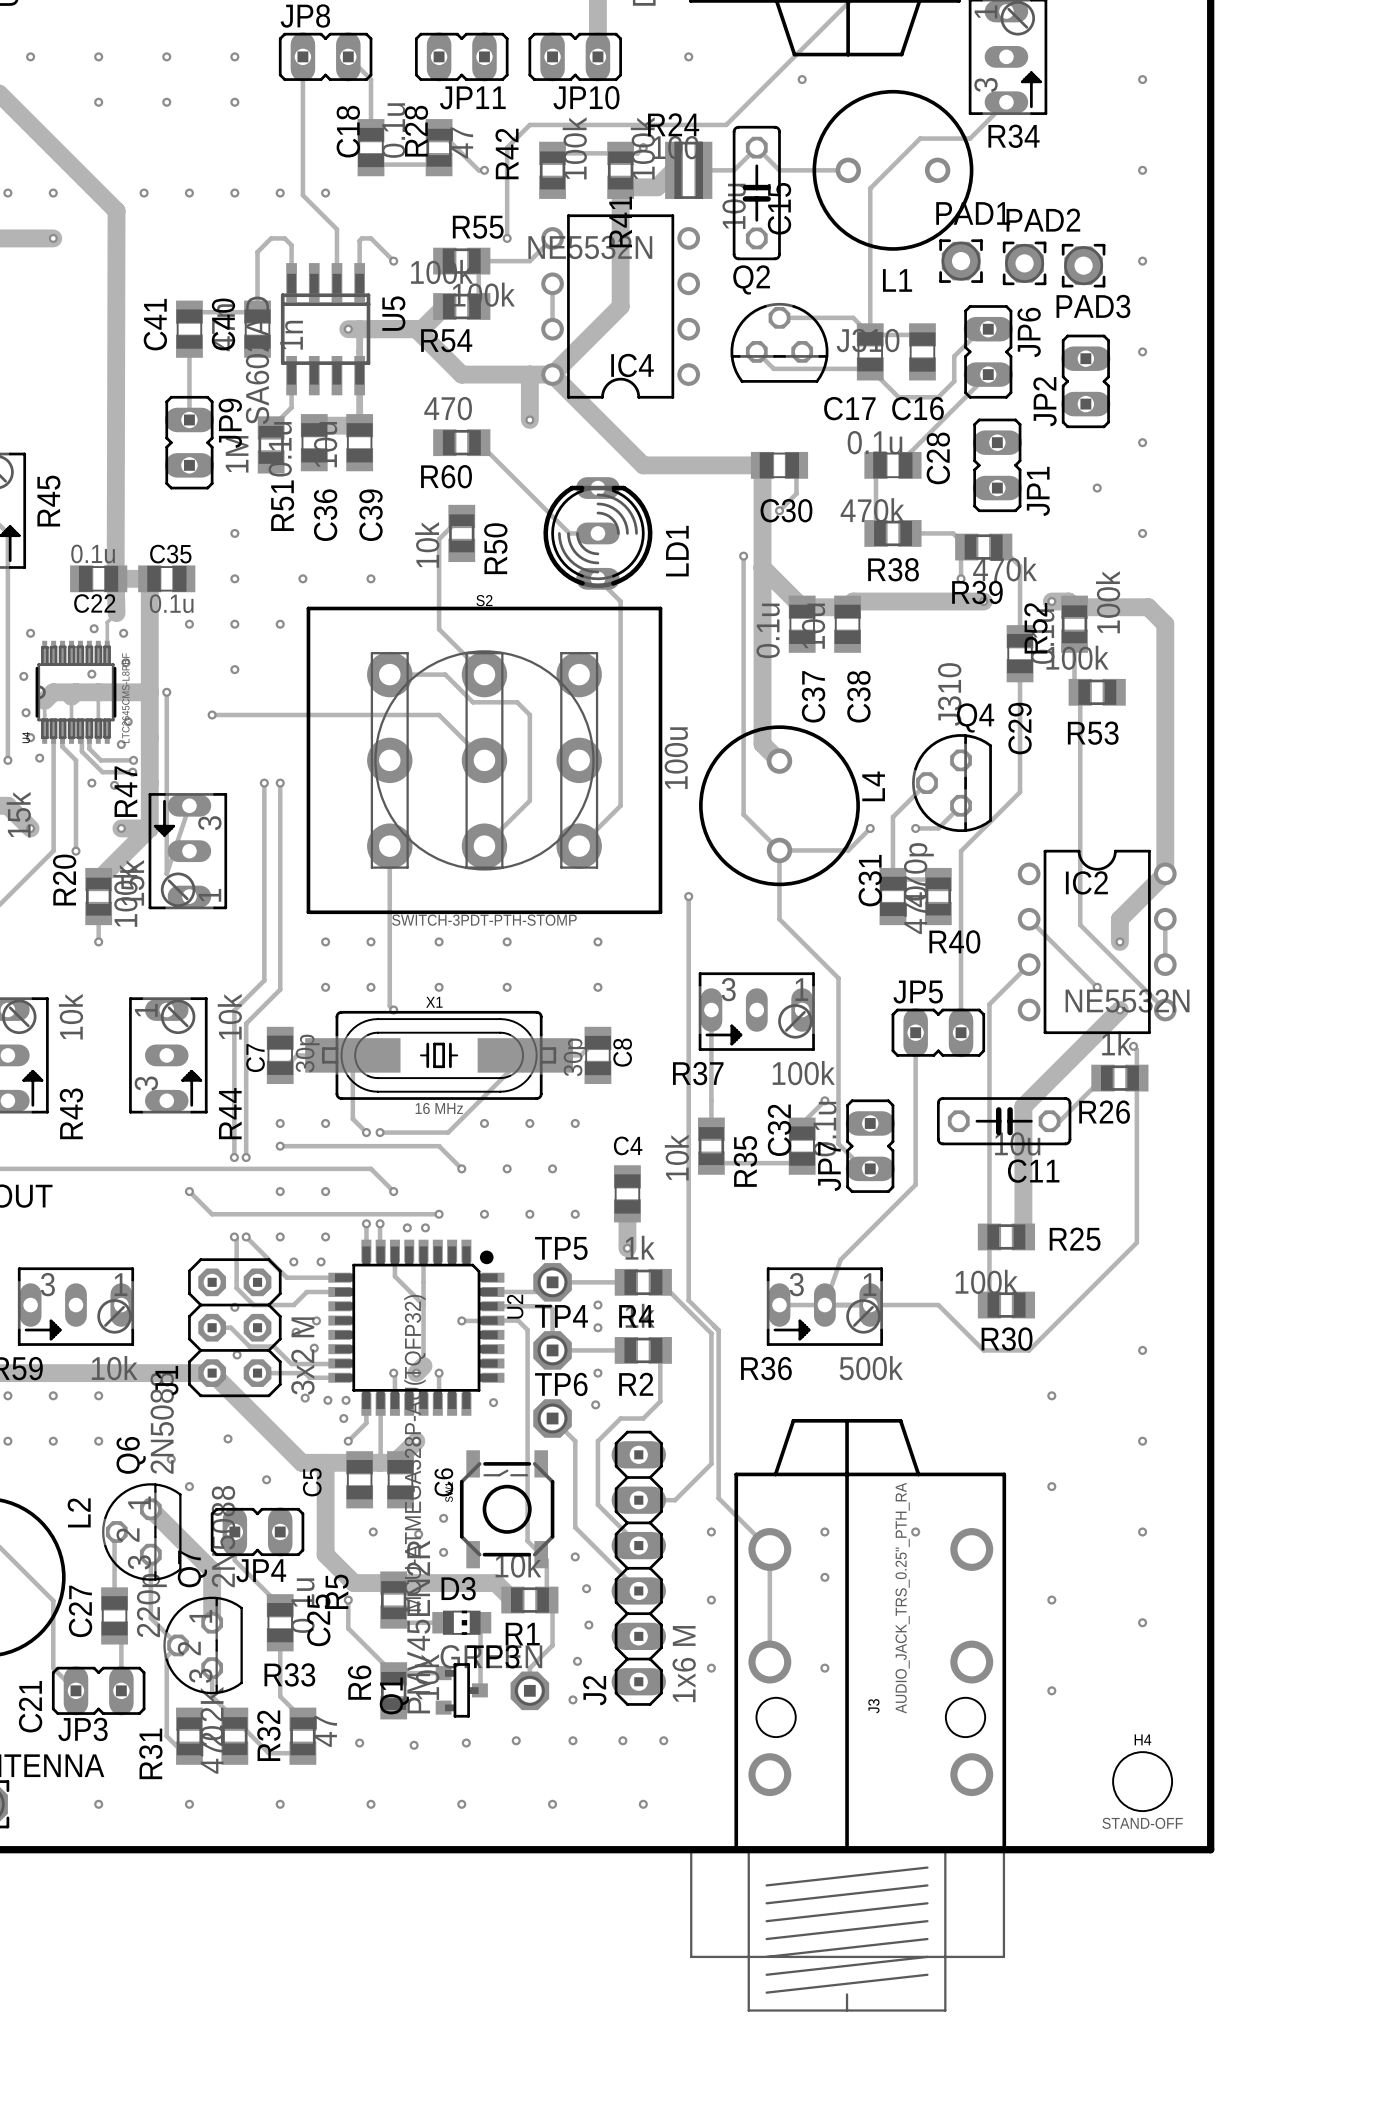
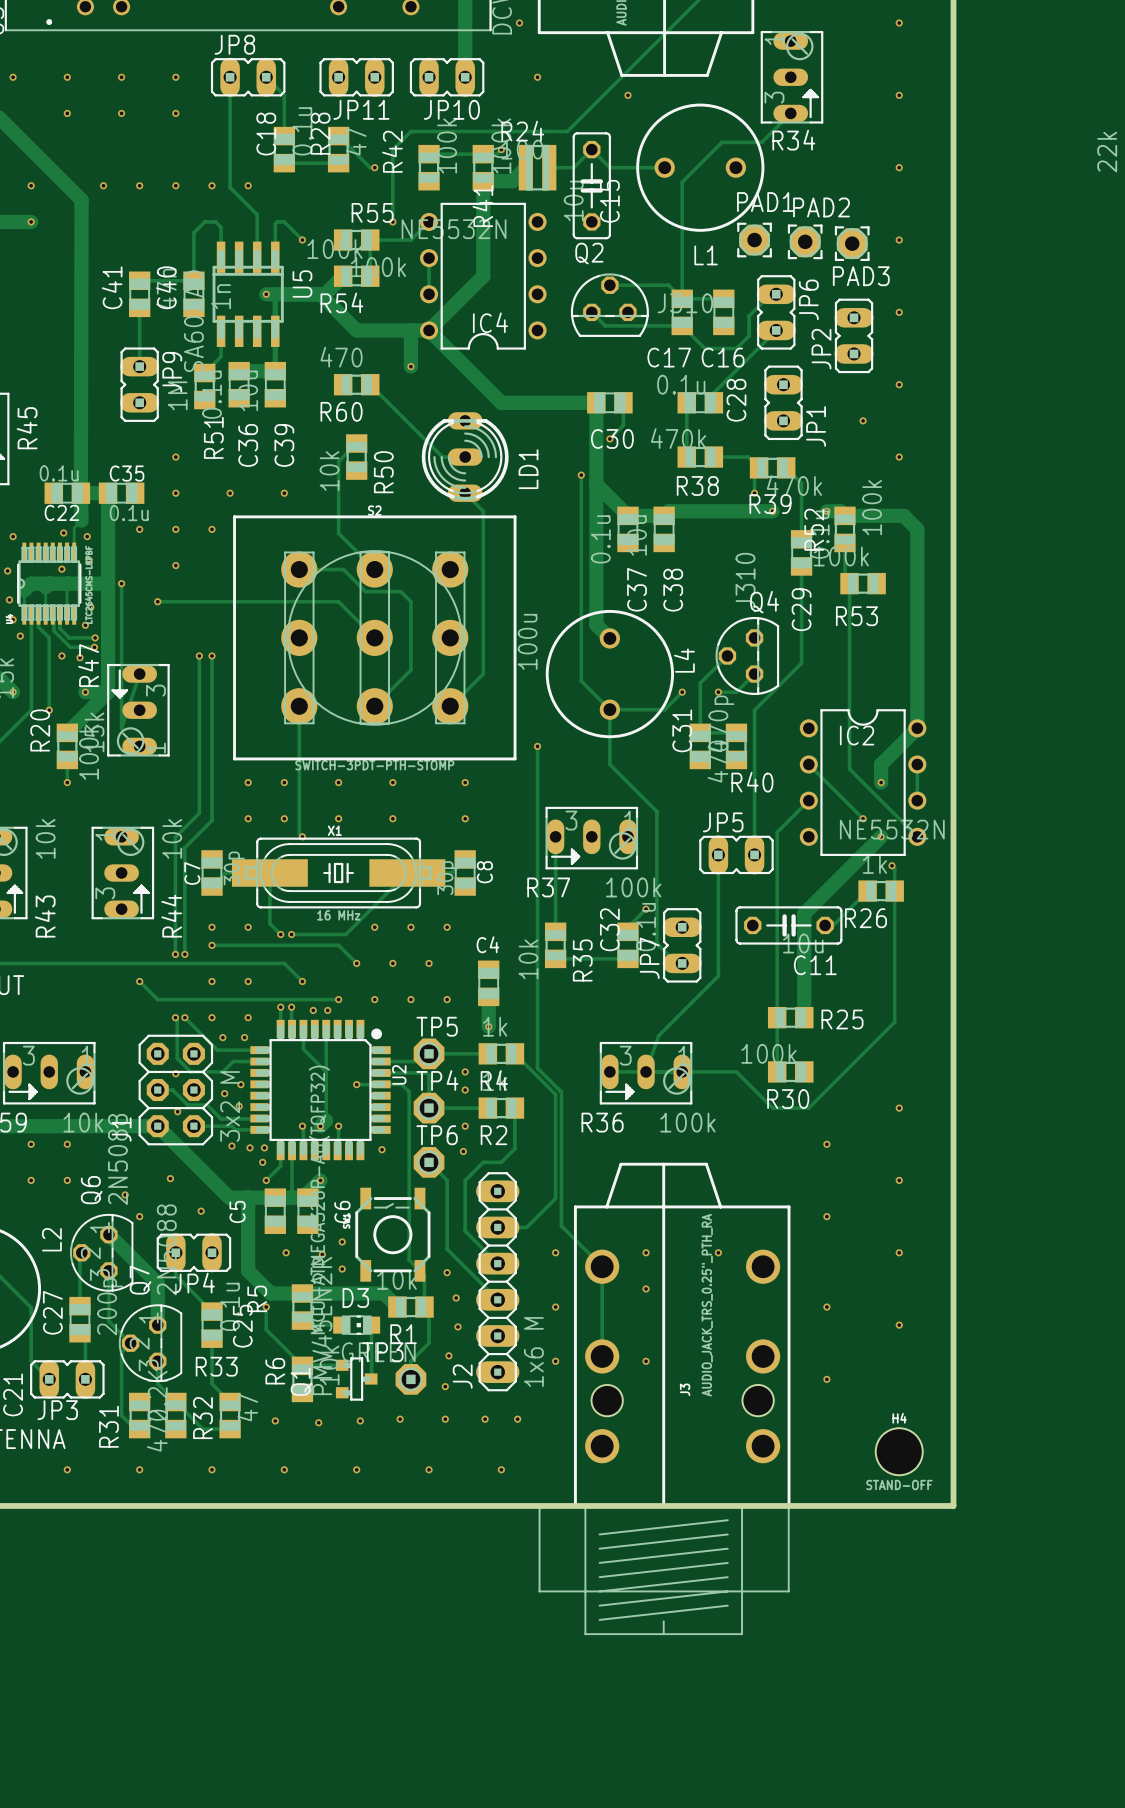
R36 value: 500k (871, 1368) -> 100k (687, 1122)
C27 value: 220p (151, 1605) -> 200p (110, 1306)

